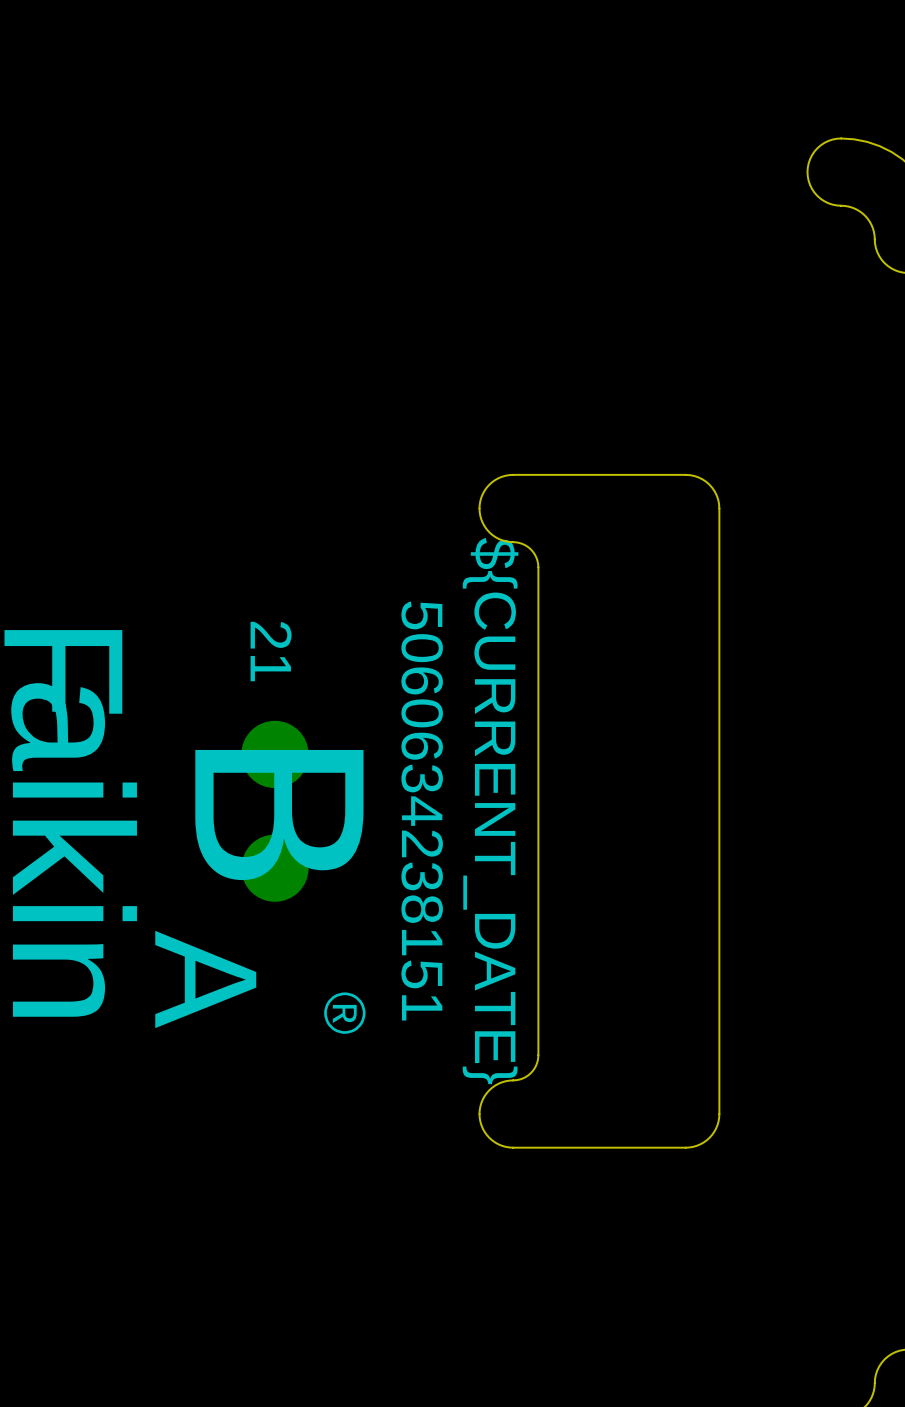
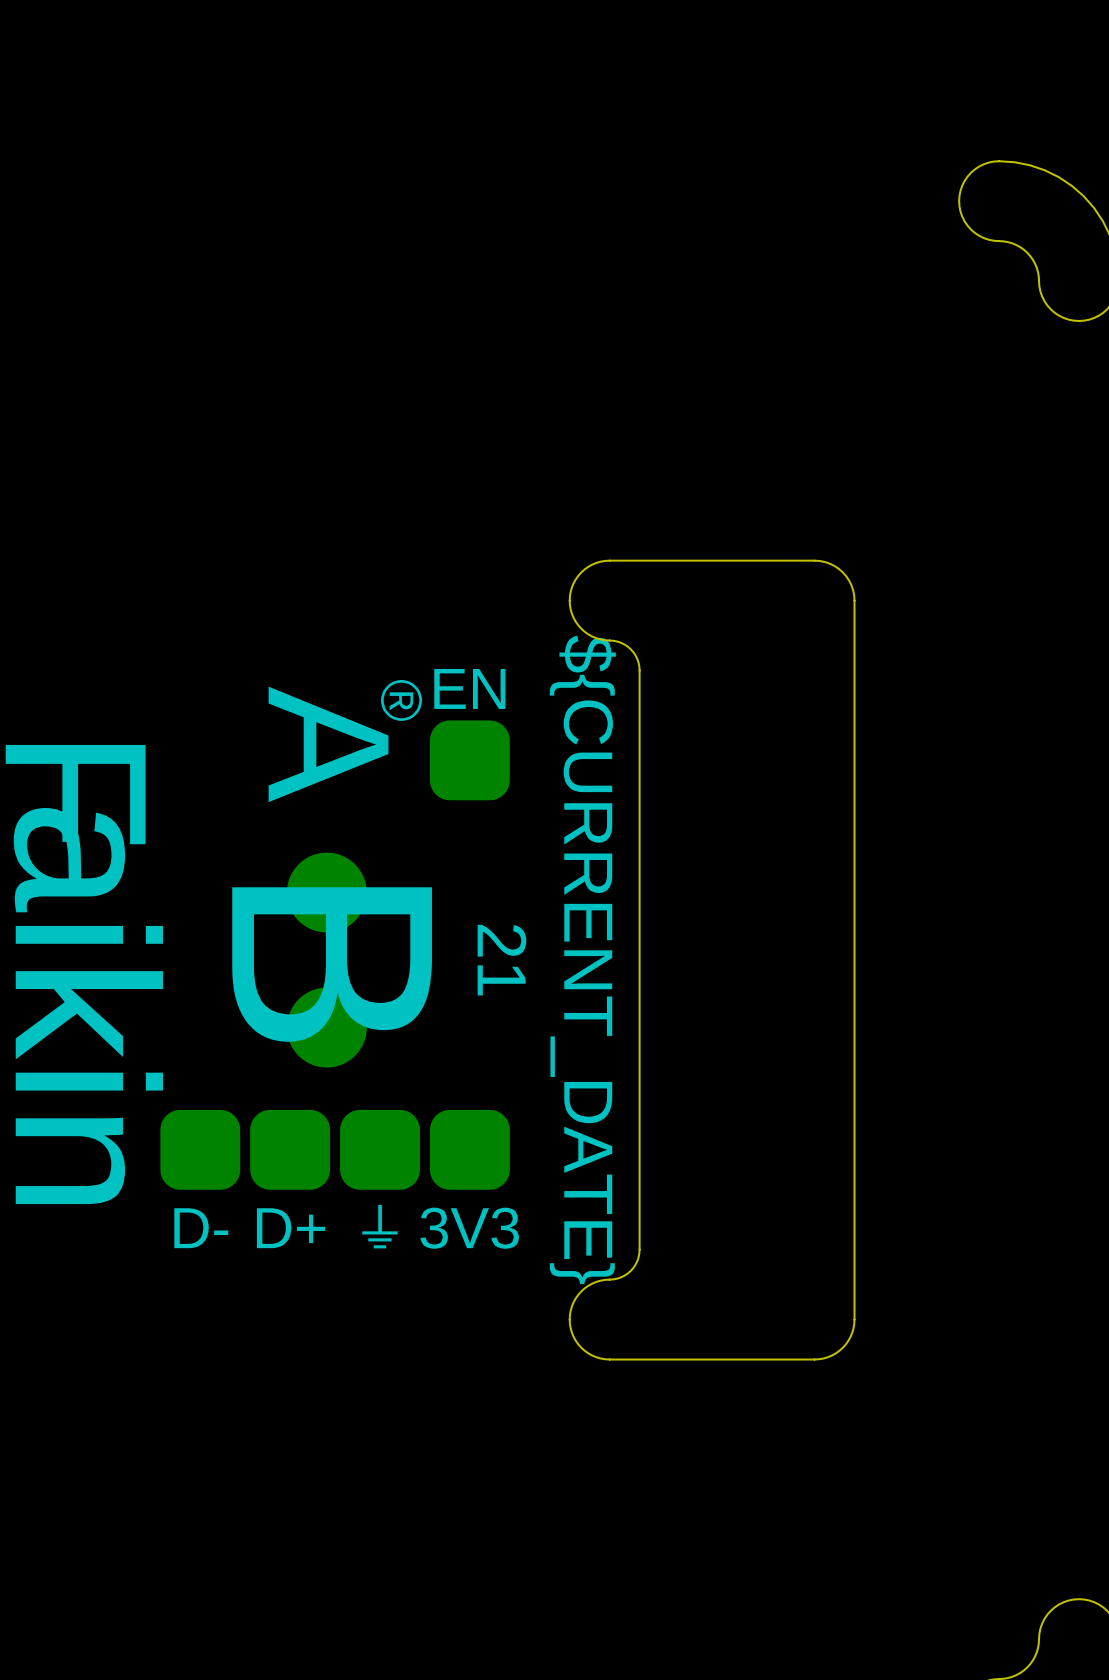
text: none -> EN (469, 688)
part: none -> (469, 760)
text: 21 (271, 651) -> none
text: 5060634238151 (422, 811) -> 21 (501, 960)
part: none -> (200, 1149)
part: none -> (290, 1149)
part: none -> (380, 1149)
part: none -> (469, 1149)
text position: A (205, 979) -> A (328, 744)
text position: ® (344, 1013) -> ® (401, 700)
text: none -> ⏚ (379, 1226)
text: none -> D- (201, 1228)
text: none -> D+ (291, 1228)
text: none -> 3V3 (469, 1228)

